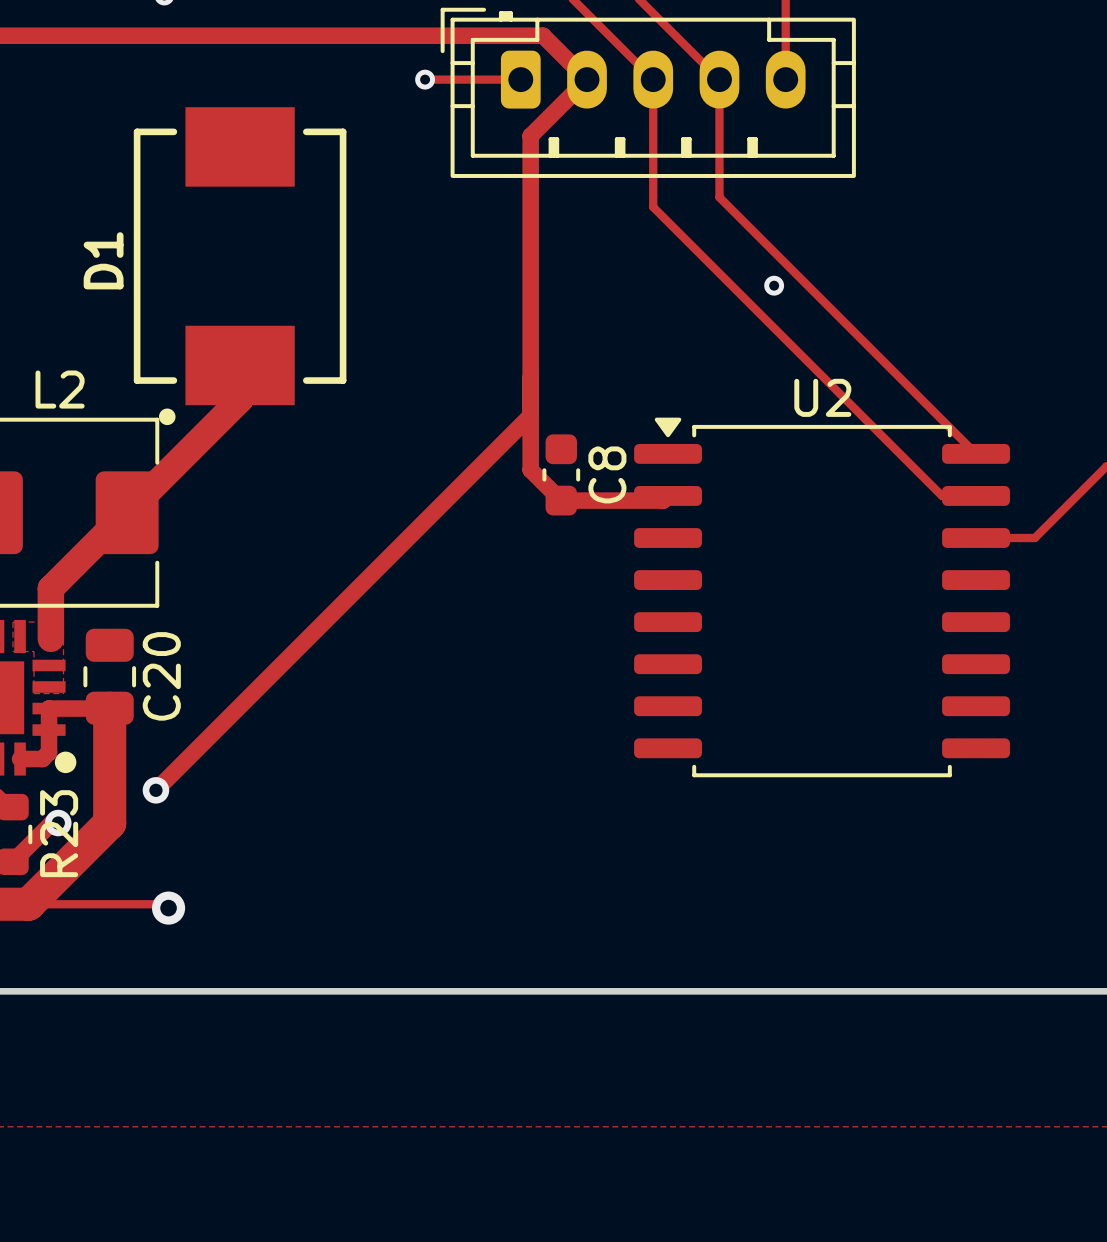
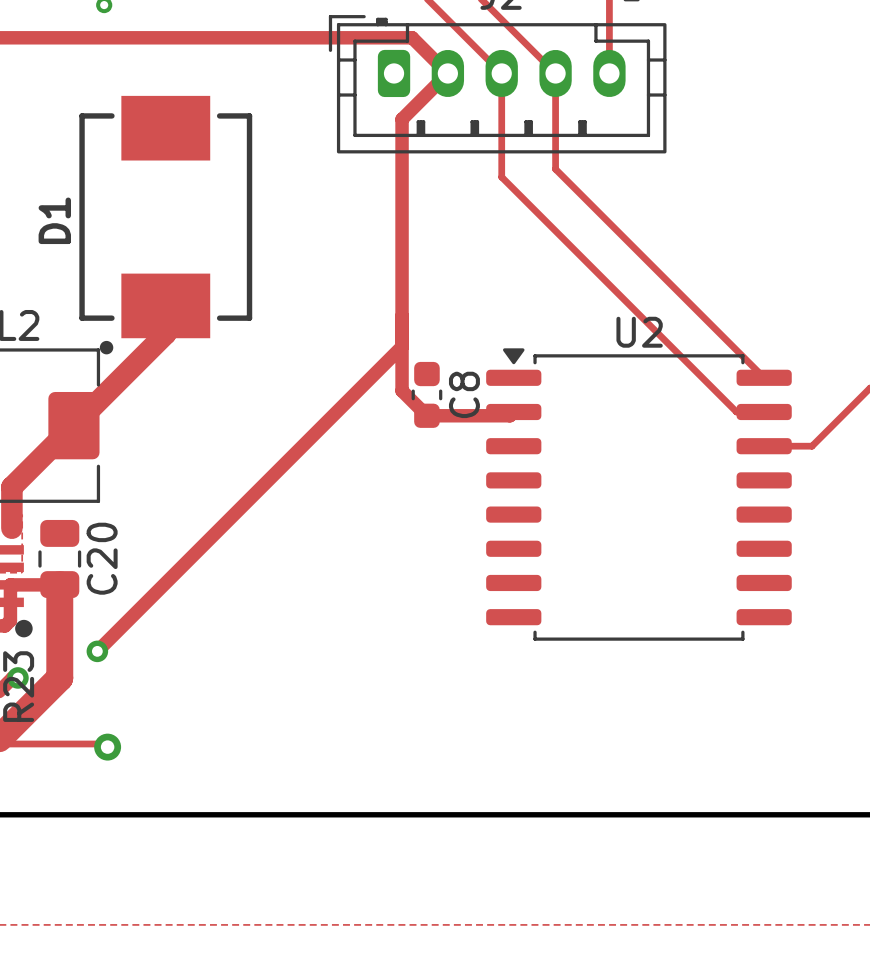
track: (425, 79) (520, 79) -> none
via: (425, 79) -> none
via: (774, 285) -> none

